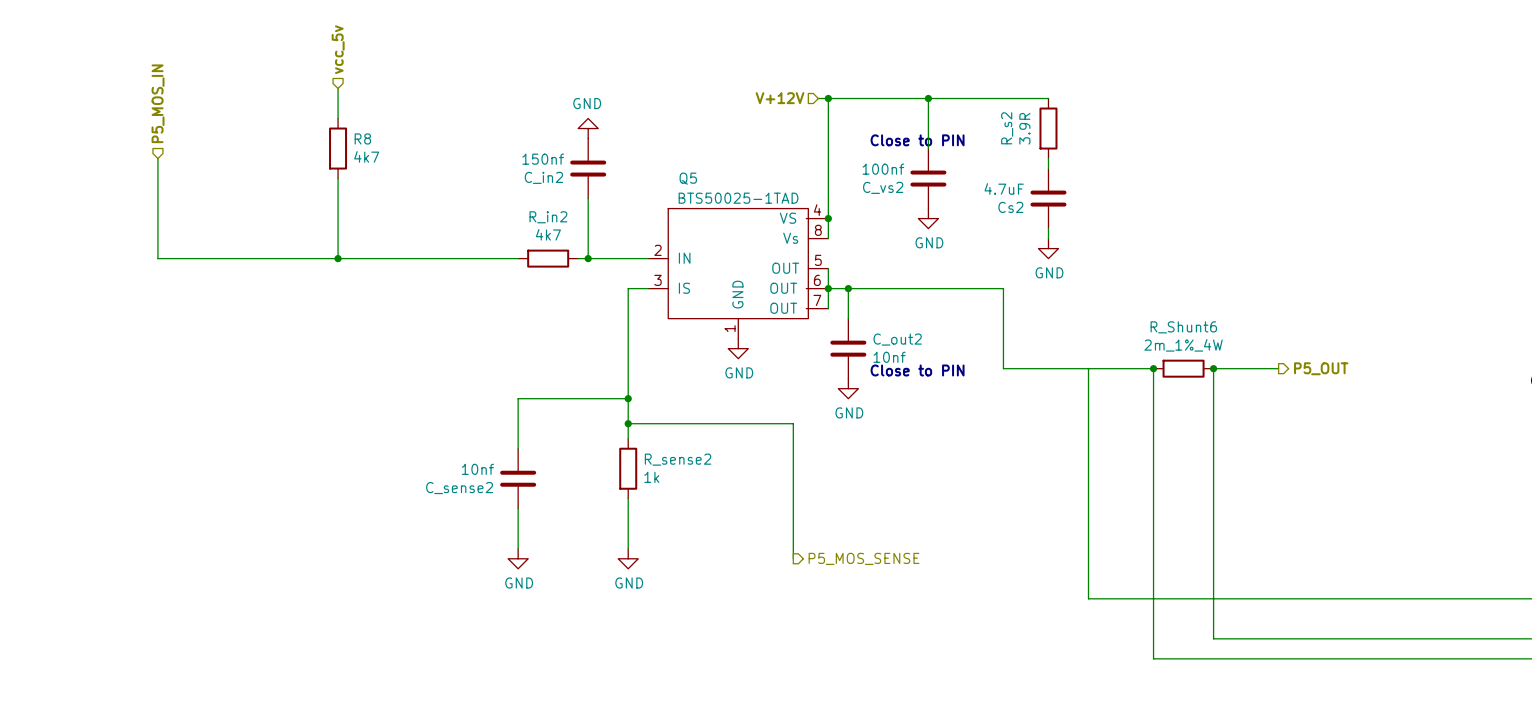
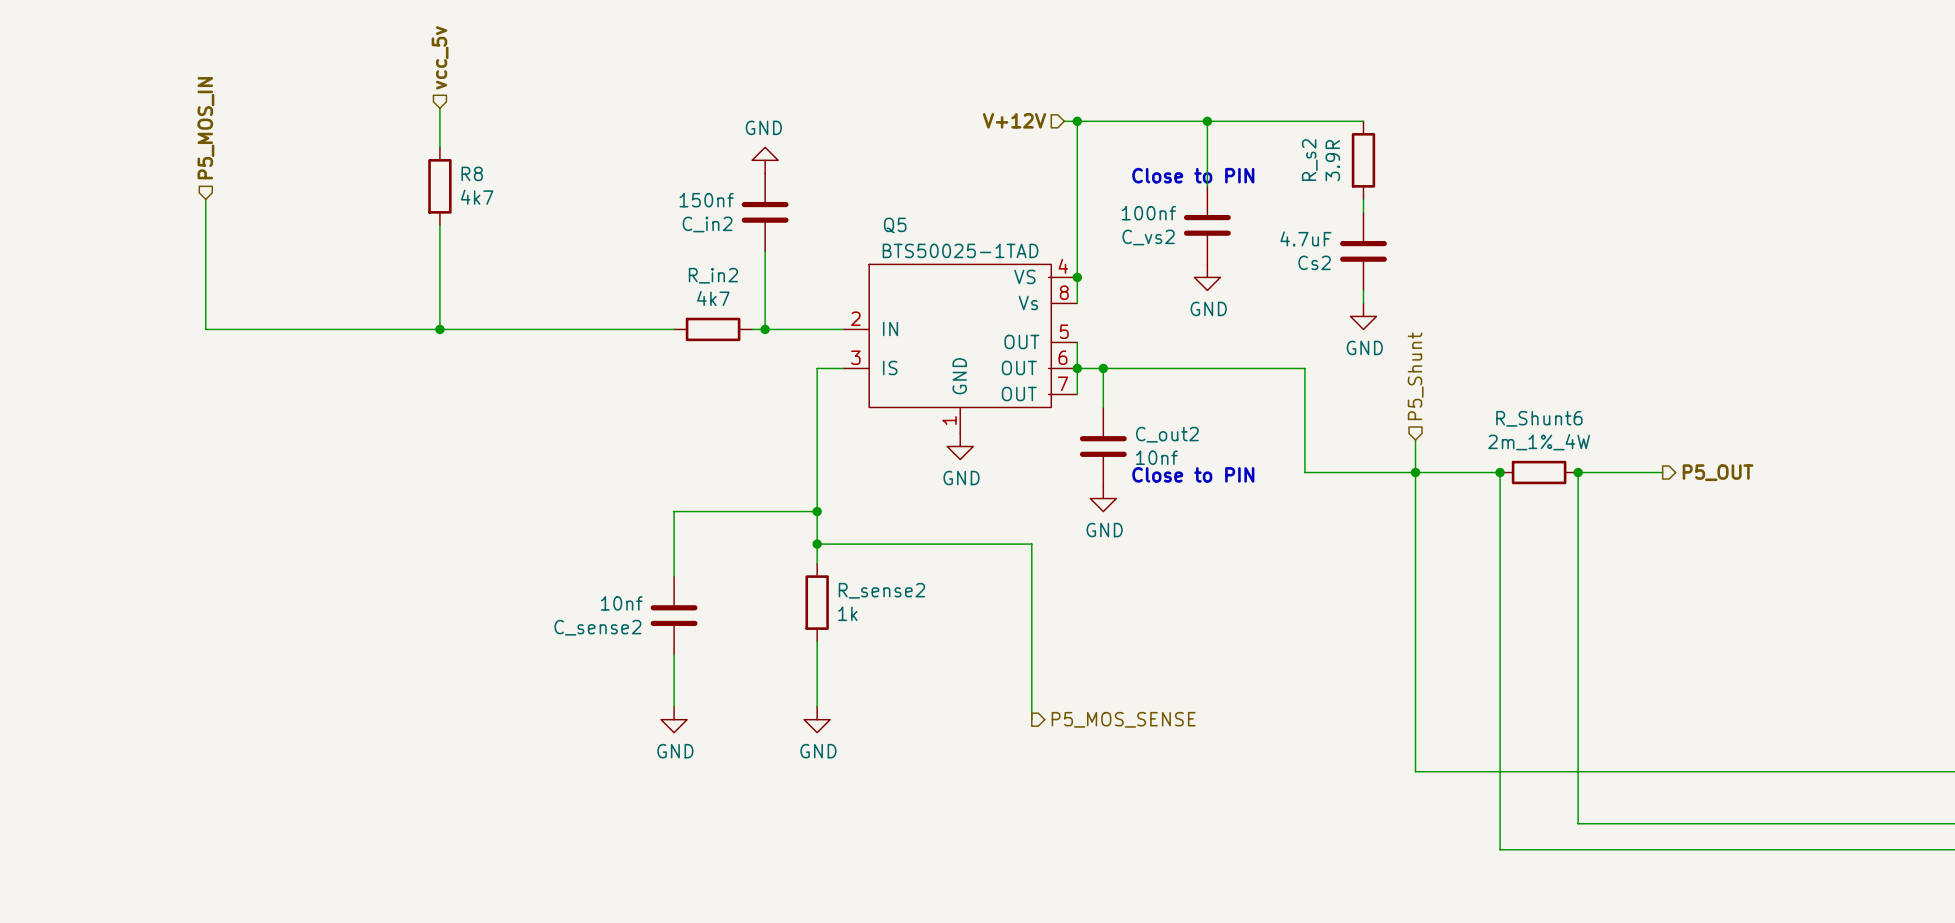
hierarchical label: none -> P5_Shunt (1415, 376)
wire: none -> (1415, 440) (1415, 472)
junction: none -> (1415, 472)

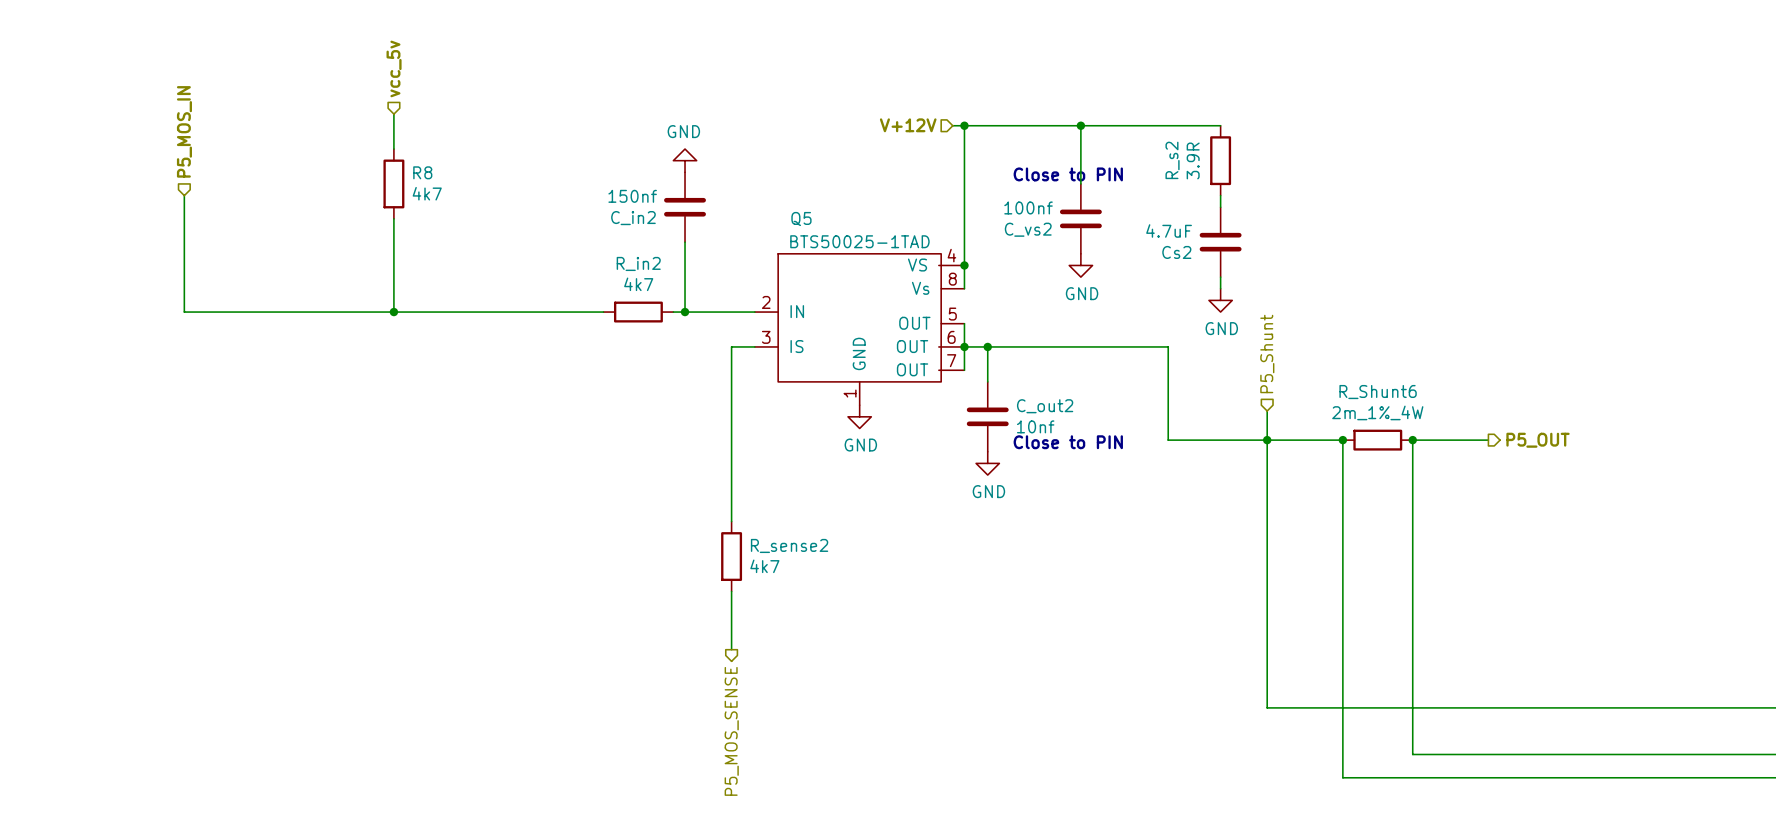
wire: (817, 511) (674, 511) (674, 576) -> none
junction: (817, 511) -> none
wire: (817, 544) (1031, 544) (1031, 719) -> none
junction: (817, 544) -> none
R_sense2 value: 1k (847, 613) -> 4k7 (764, 566)
C_sense2: 10nf (674, 615) -> none
wire: (674, 654) (674, 706) -> none
power symbol: GND (674, 719) -> none
power symbol: GND (817, 719) -> none
hierarchical label rotation: 0° (1123, 719) -> 90° clockwise (731, 731)
hierarchical label position: P5_MOS_SENSE (1123, 719) -> P5_MOS_SENSE (731, 731)

